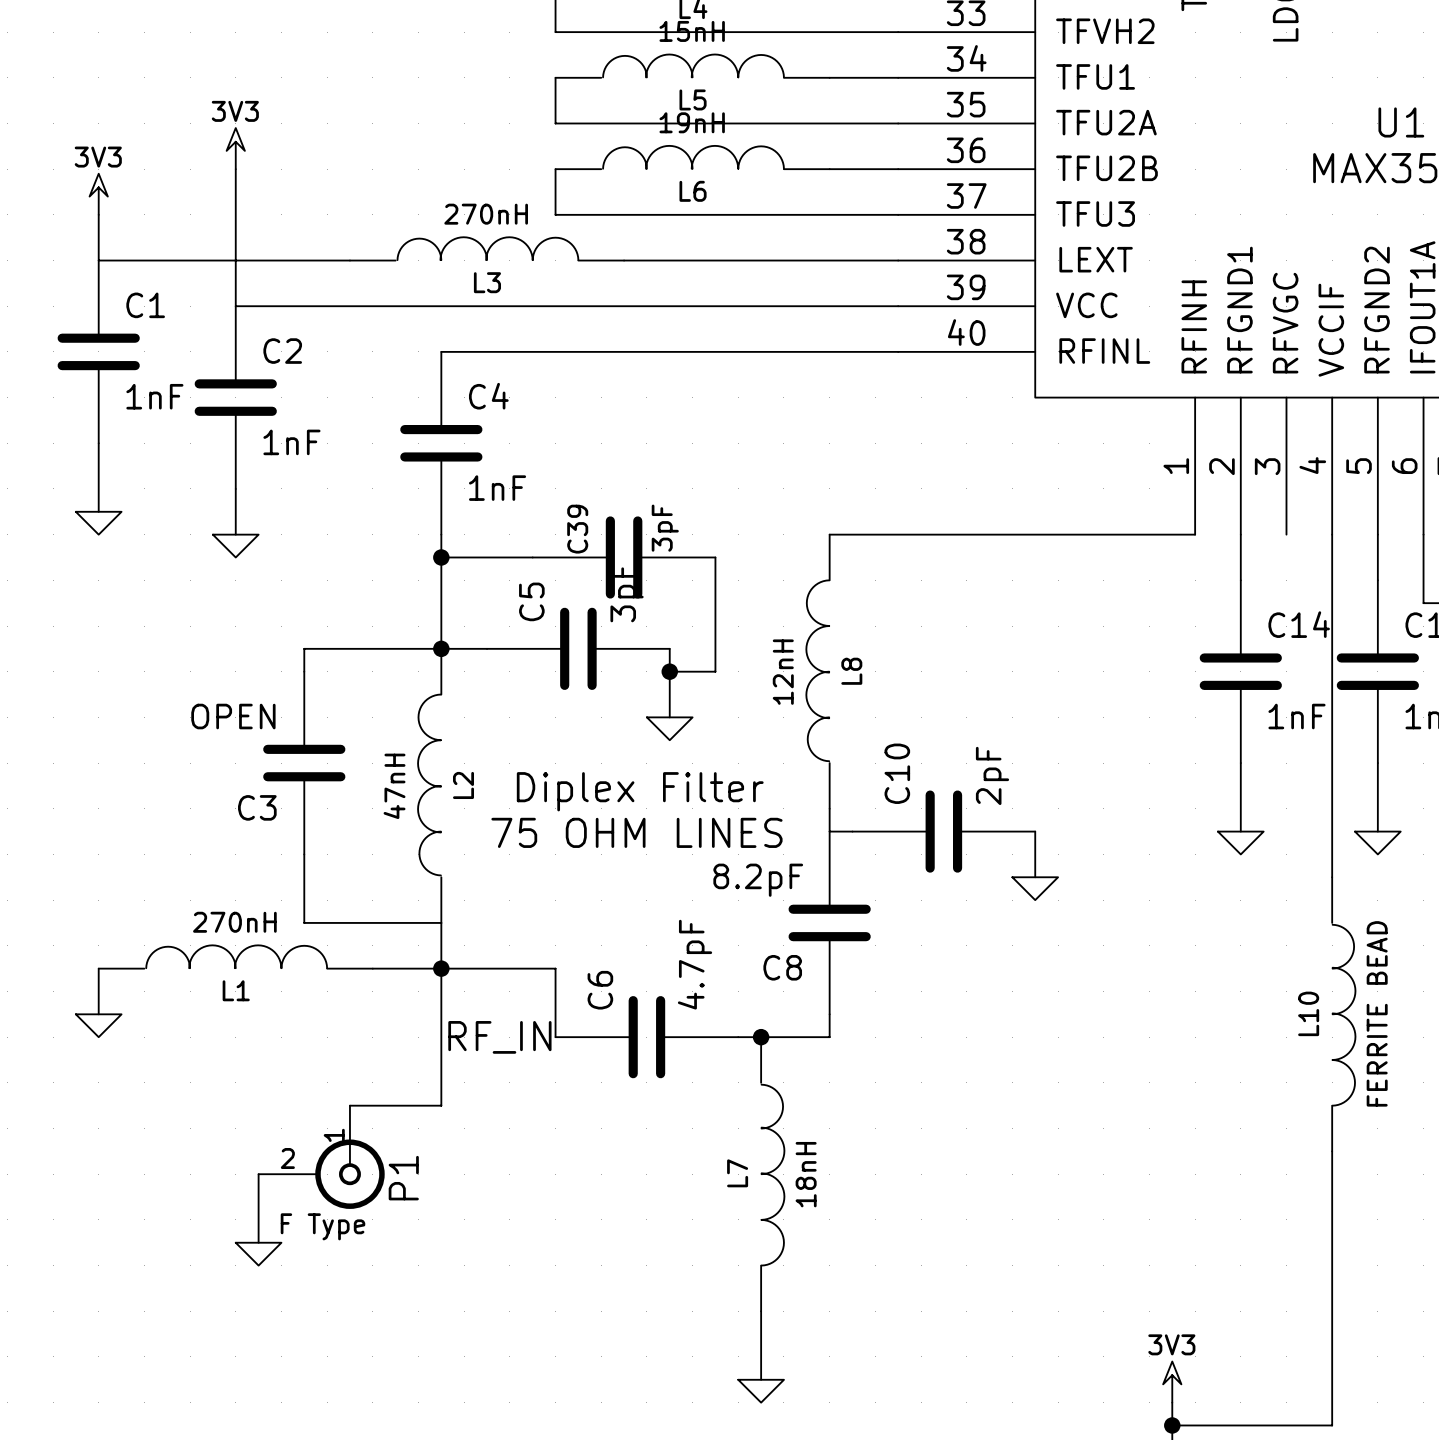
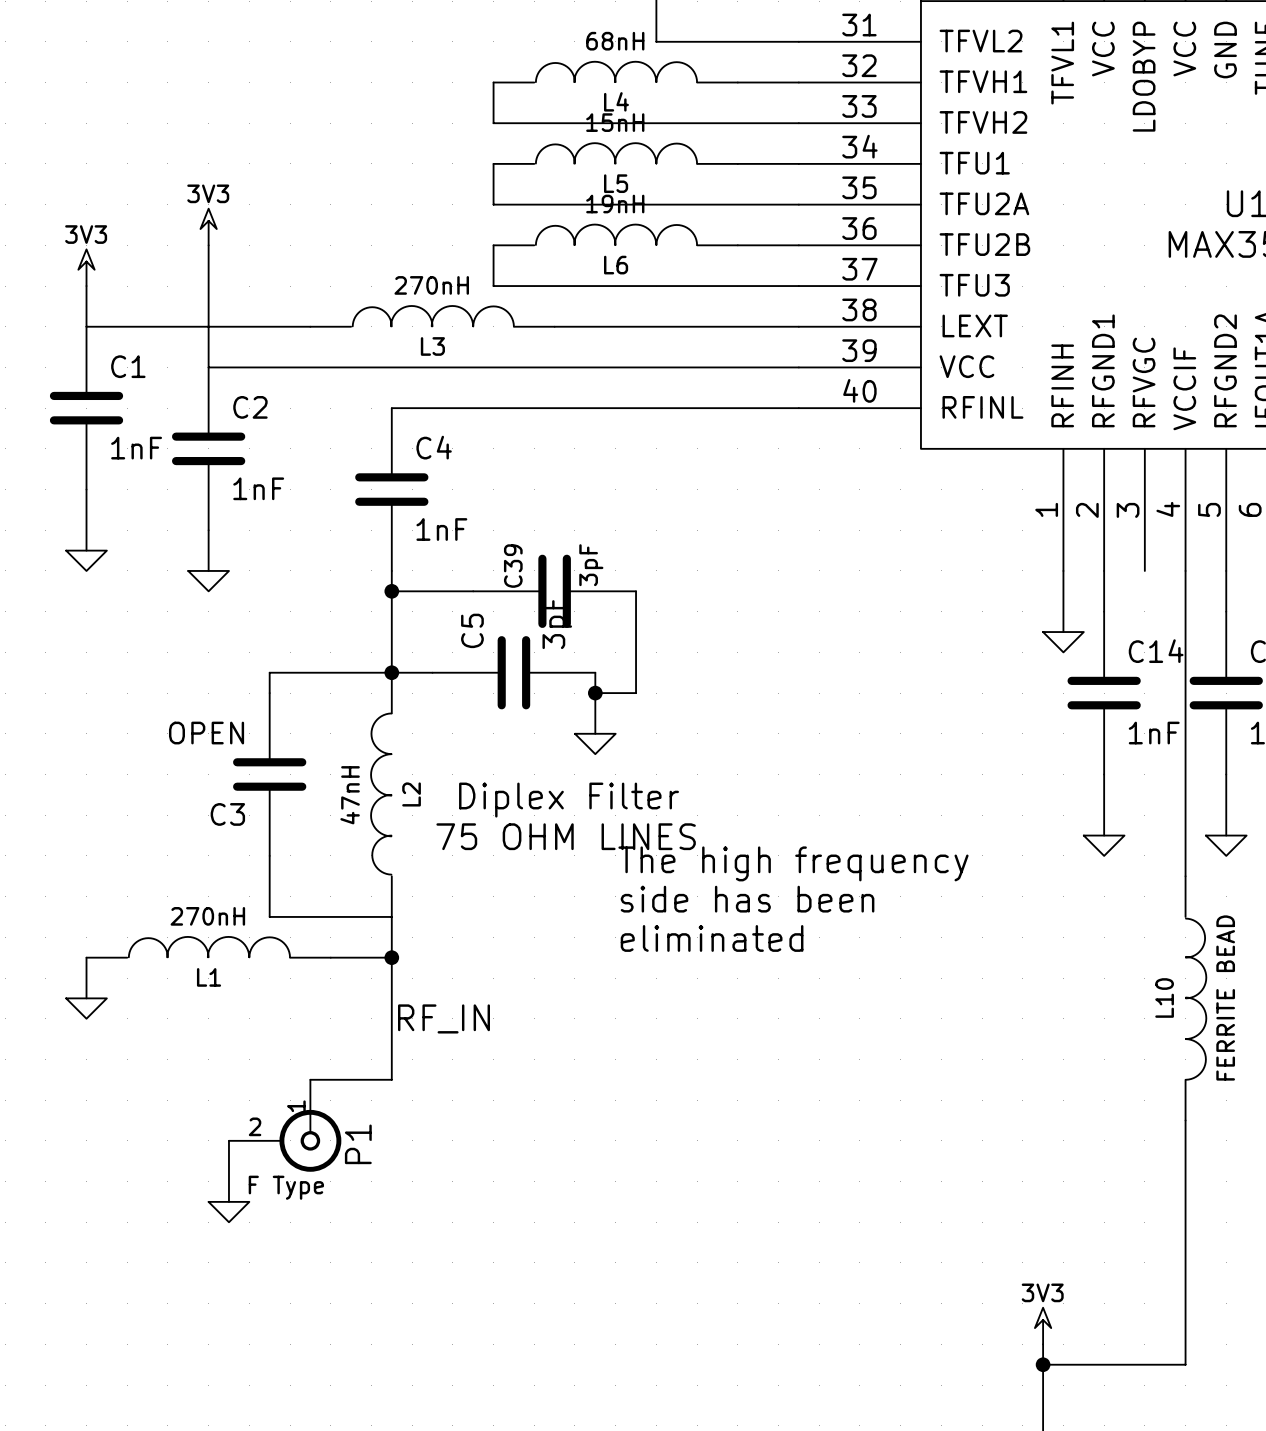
wire: (829, 534) (1195, 534) -> (1063, 632) (1063, 570)
L8: 12nH (818, 671) -> none
wire: (829, 808) (829, 831) (852, 831) -> none
C10: 2pF (943, 831) -> none
wire: (1035, 831) (1035, 877) -> none
text: none -> The high frequency (793, 863)
power symbol position: (1035, 888) -> (1063, 642)
text: none -> side has been (747, 899)
C8: 8.2pF (829, 922) -> none
text: none -> eliminated (712, 938)
wire: (441, 968) (555, 968) (555, 1037) -> none
wire: (829, 1014) (829, 1037) (738, 1037) -> none
C6: 4.7pF (646, 1037) -> none
junction: (761, 1037) -> none
L7: 18nH (772, 1174) -> none
wire: (761, 1311) (761, 1379) -> none
power symbol: (761, 1391) -> none

